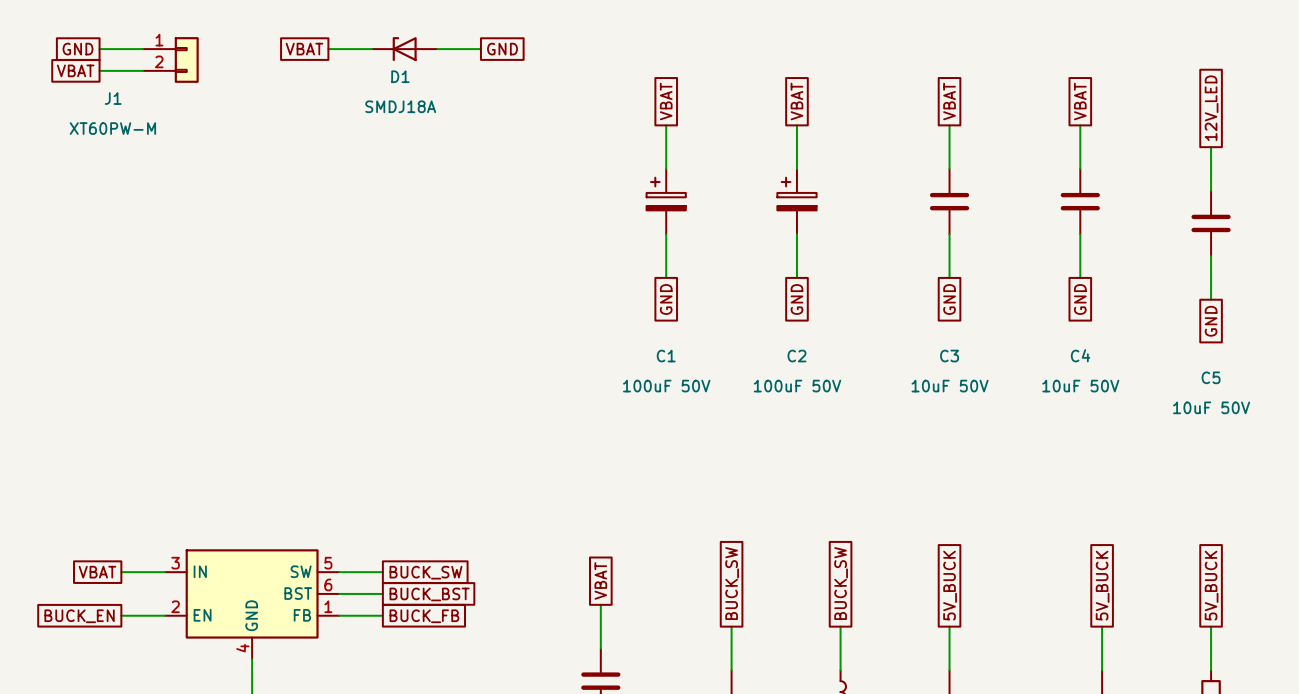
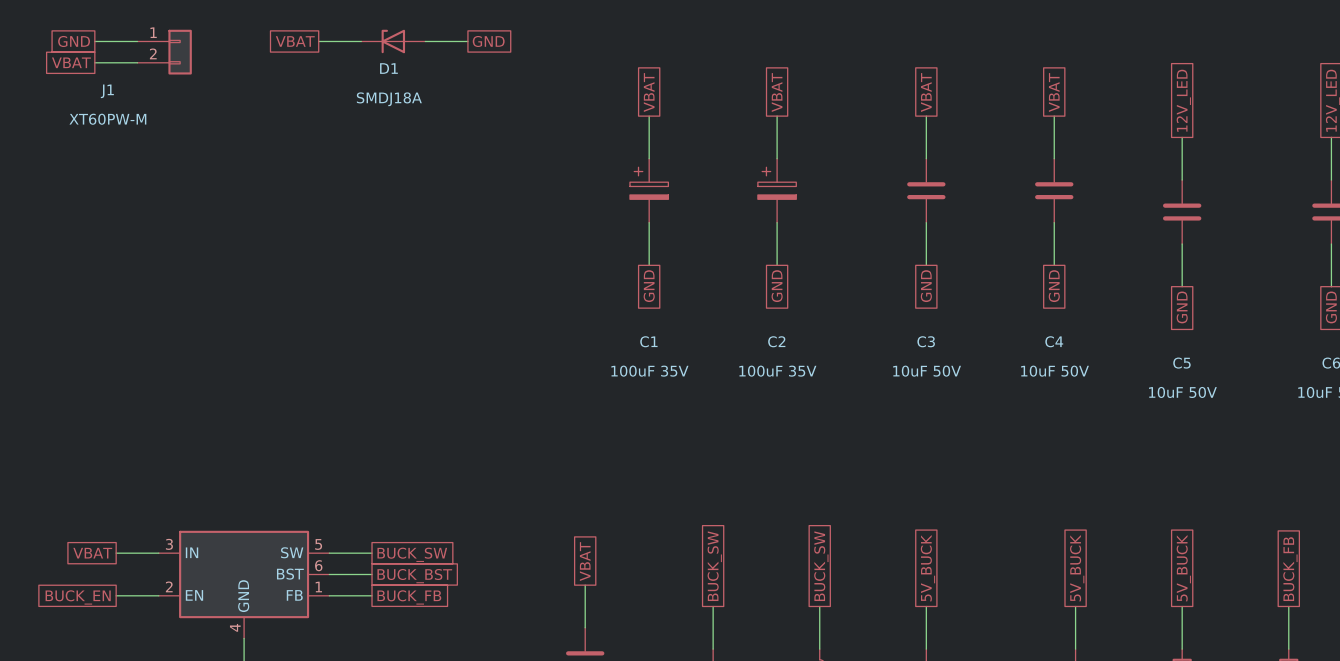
C1 value: 100uF 50V (666, 386) -> 100uF 35V (649, 371)
C2 value: 100uF 50V (797, 386) -> 100uF 35V (777, 371)

